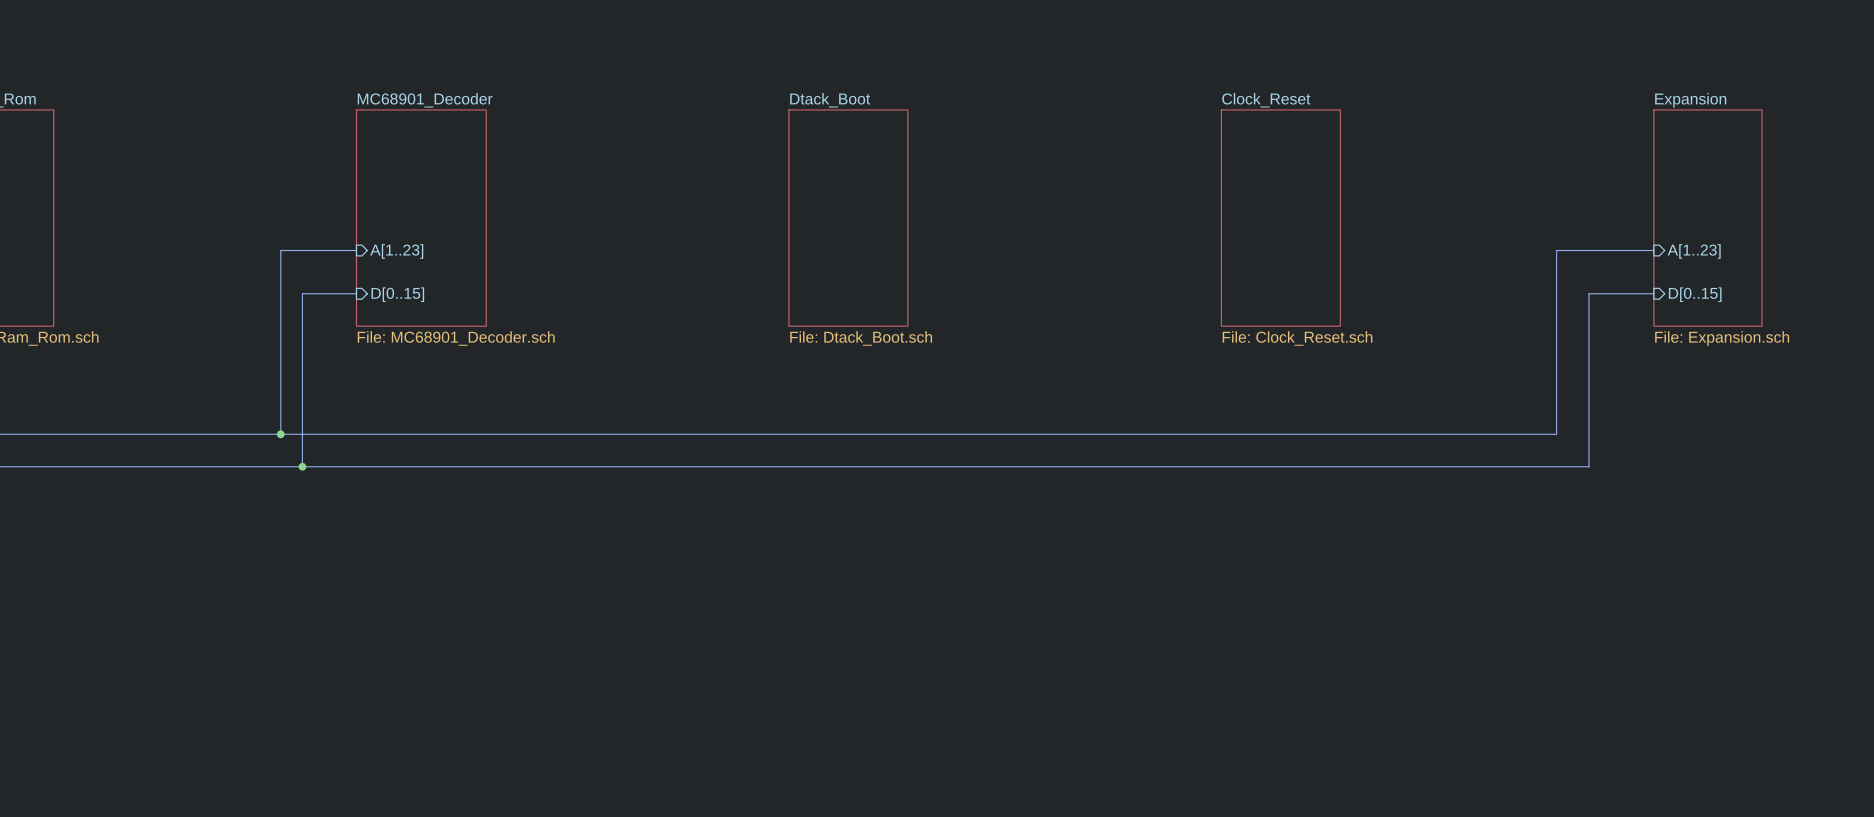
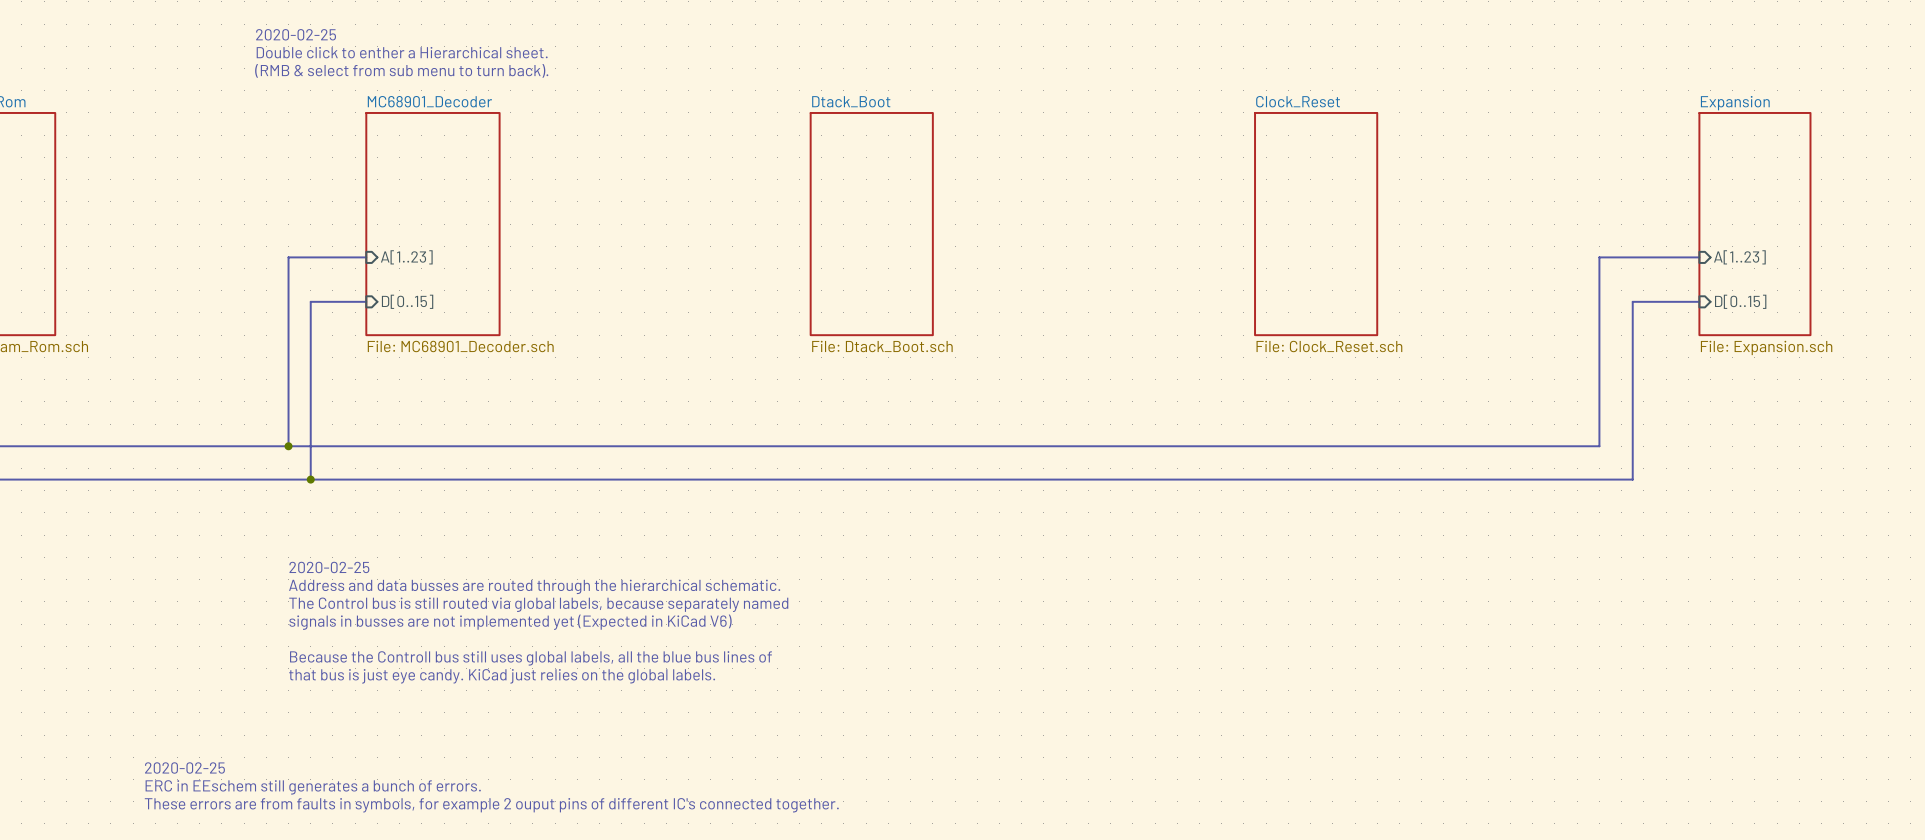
text: none -> 2020-02-25 (296, 34)
text: none -> Double click to enther a Hierarchical sheet. (402, 52)
text: none -> (RMB & select from sub menu to turn back). (401, 70)
text: none -> 2020-02-25 (329, 567)
text: none -> Address and data busses are routed through the hierarchical schematic. (534, 586)
text: none -> The Control bus is still routed via global labels, because separately named (538, 604)
text: none -> signals in busses are not implemented yet (Expected in KiCad V6) (510, 622)
text: none -> Because the Controll bus still uses global labels, all the blue bus lines of (530, 658)
text: none -> that bus is just eye candy. KiCad just relies on the global labels. (502, 676)
text: none -> 2020-02-25 (184, 767)
text: none -> ERC in EEschem still generates a bunch of errors. (313, 787)
text: none -> These errors are from faults in symbols, for example 2 ouput pins of different IC's connected together. (491, 805)

